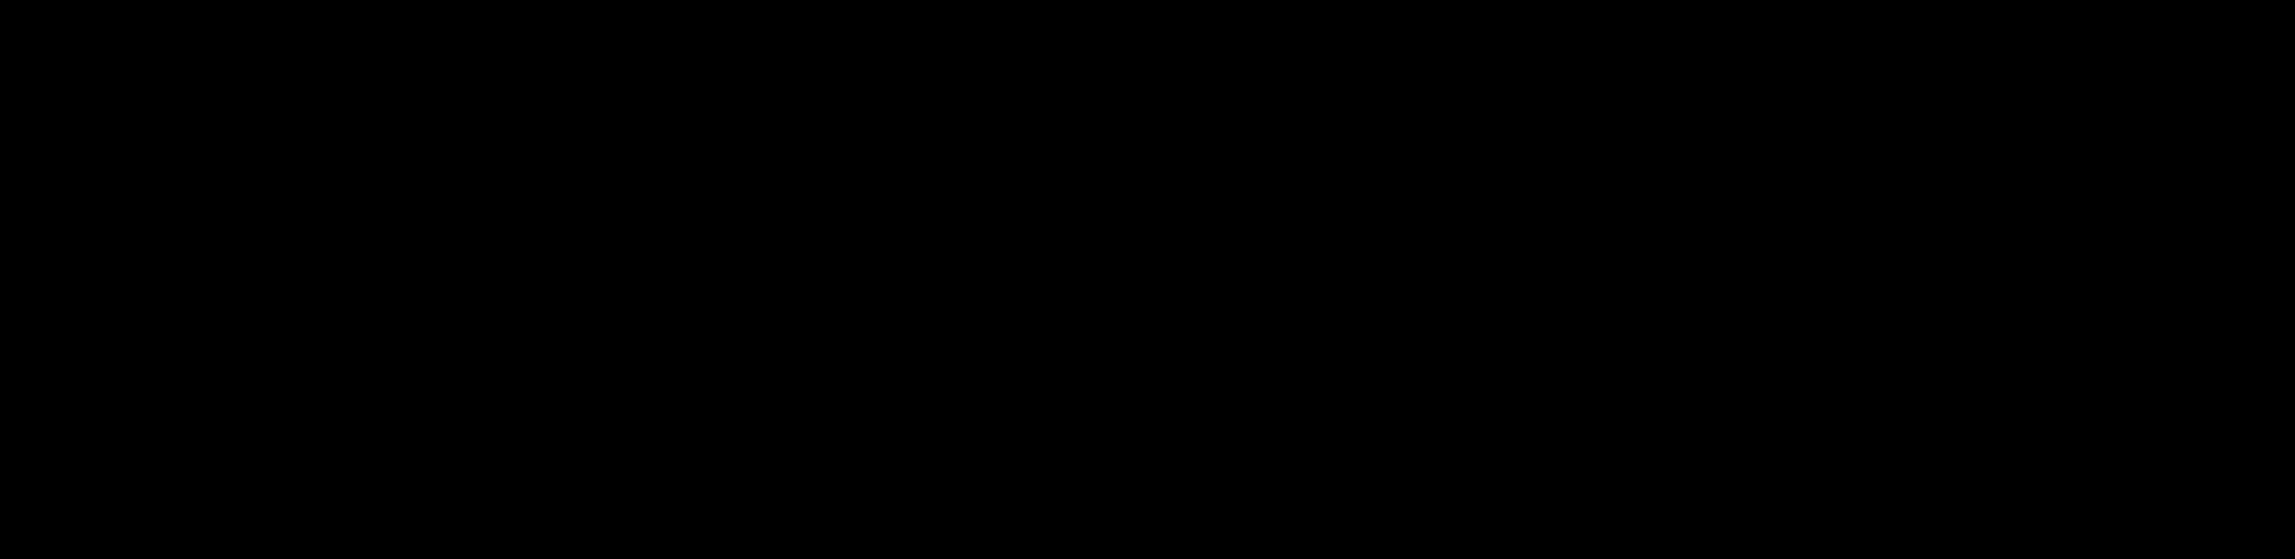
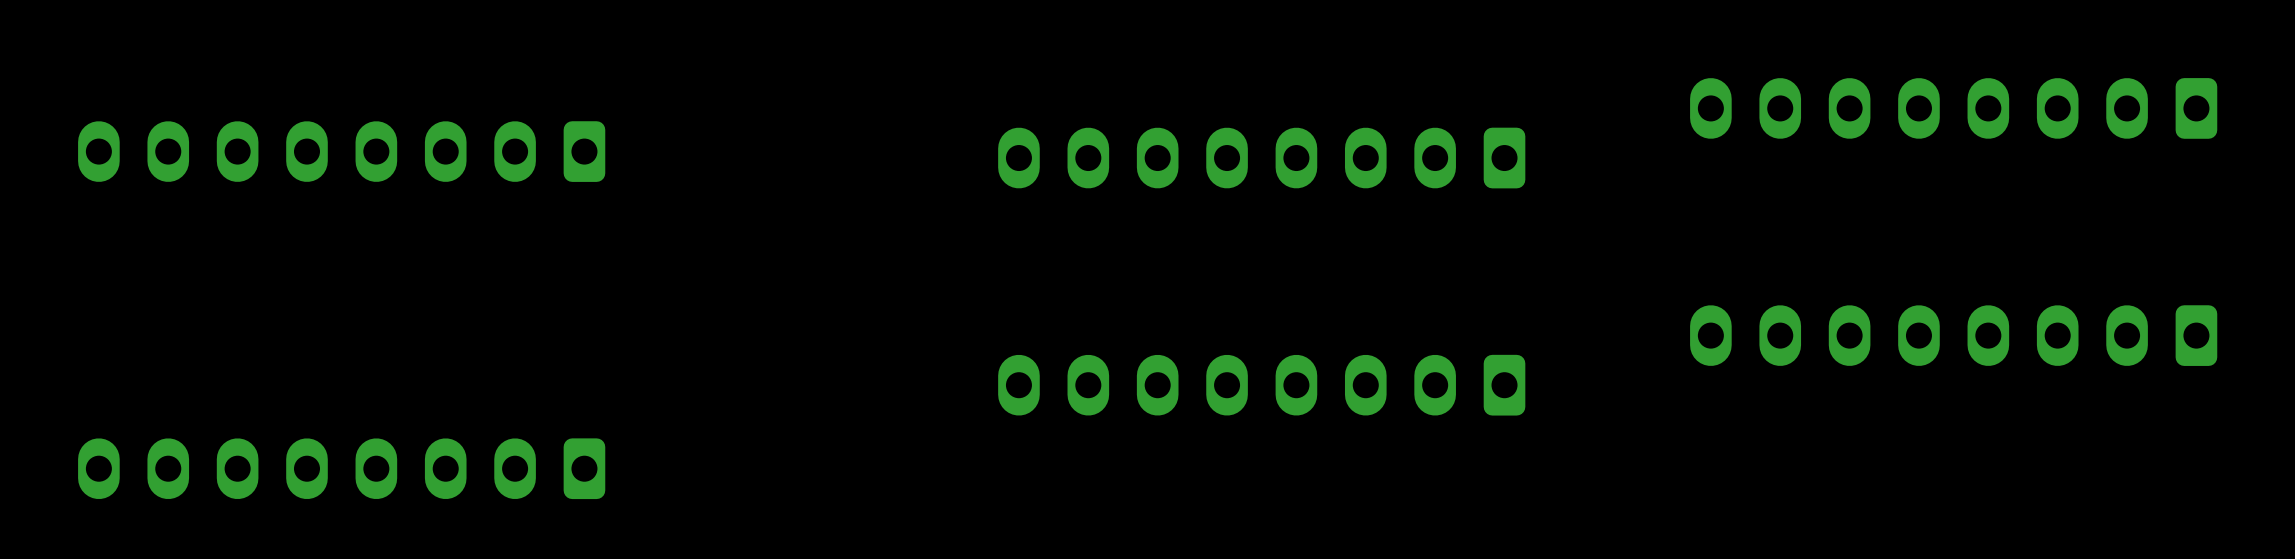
part: none -> (1953, 108)
part: none -> (341, 151)
part: none -> (1261, 158)
part: none -> (1953, 335)
part: none -> (1261, 385)
part: none -> (341, 468)

